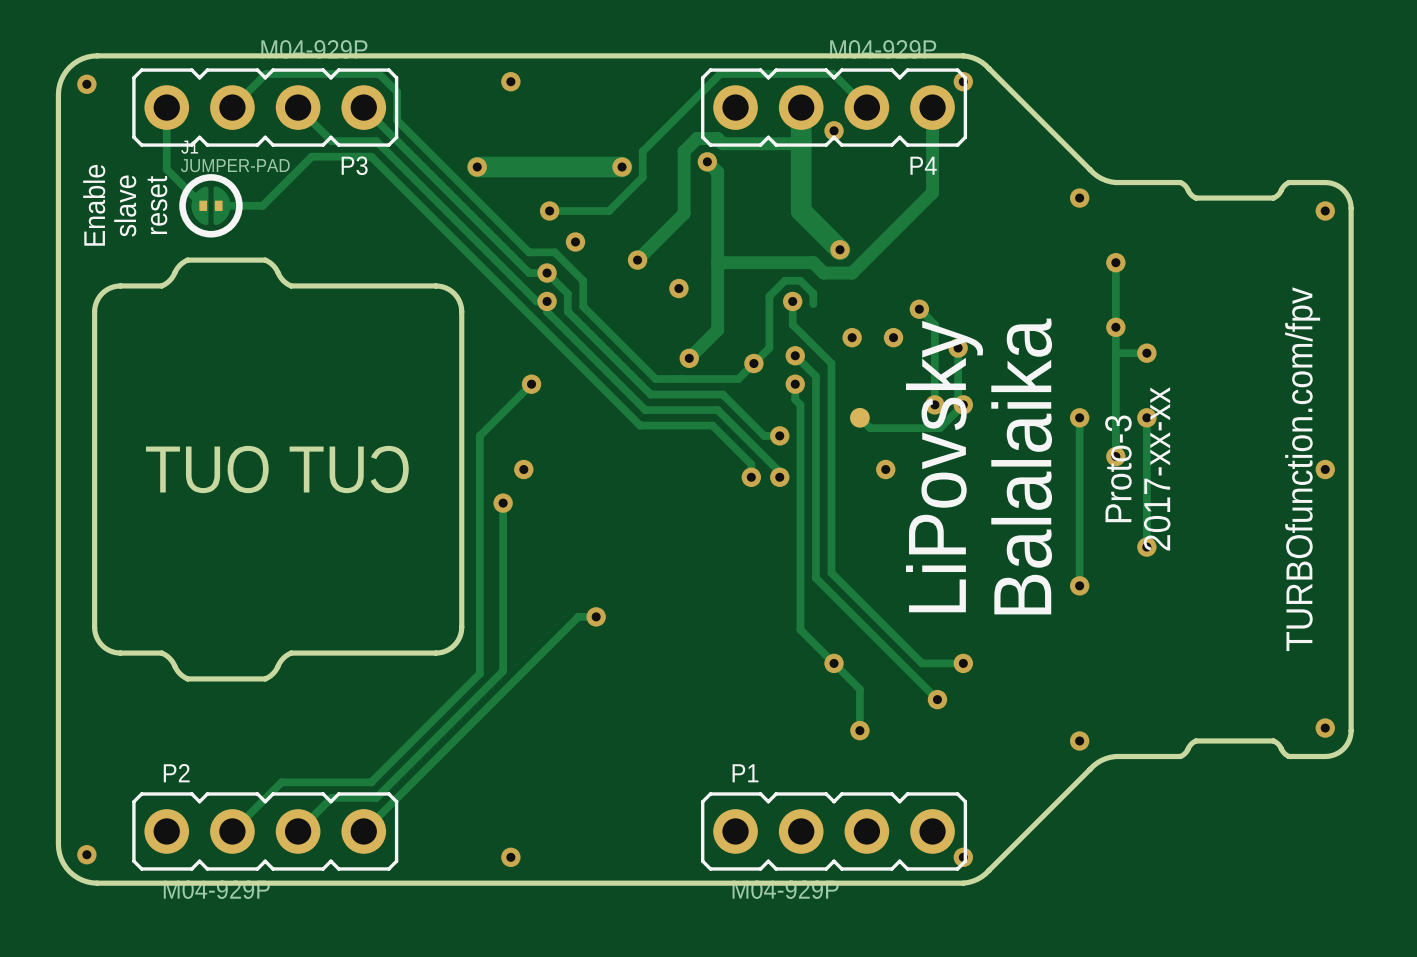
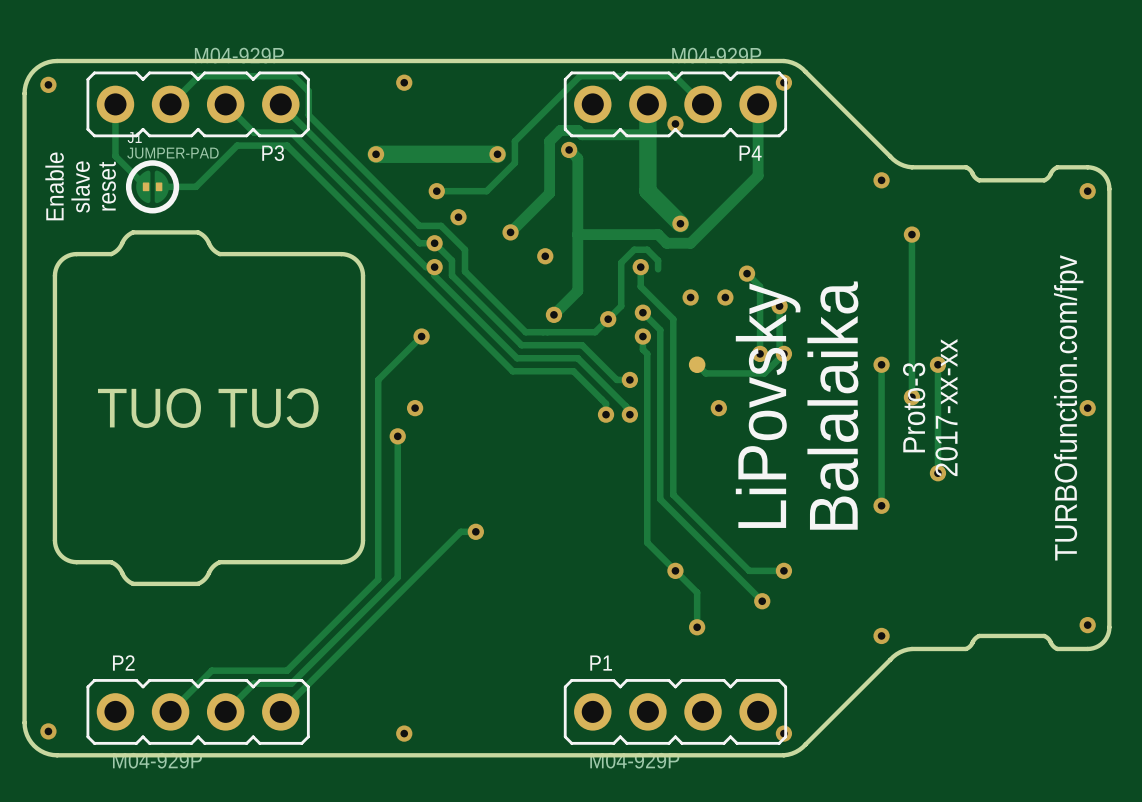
via: (1115, 327) -> none
track: (1146, 353) (1115, 353) -> none
via: (1146, 353) -> none

